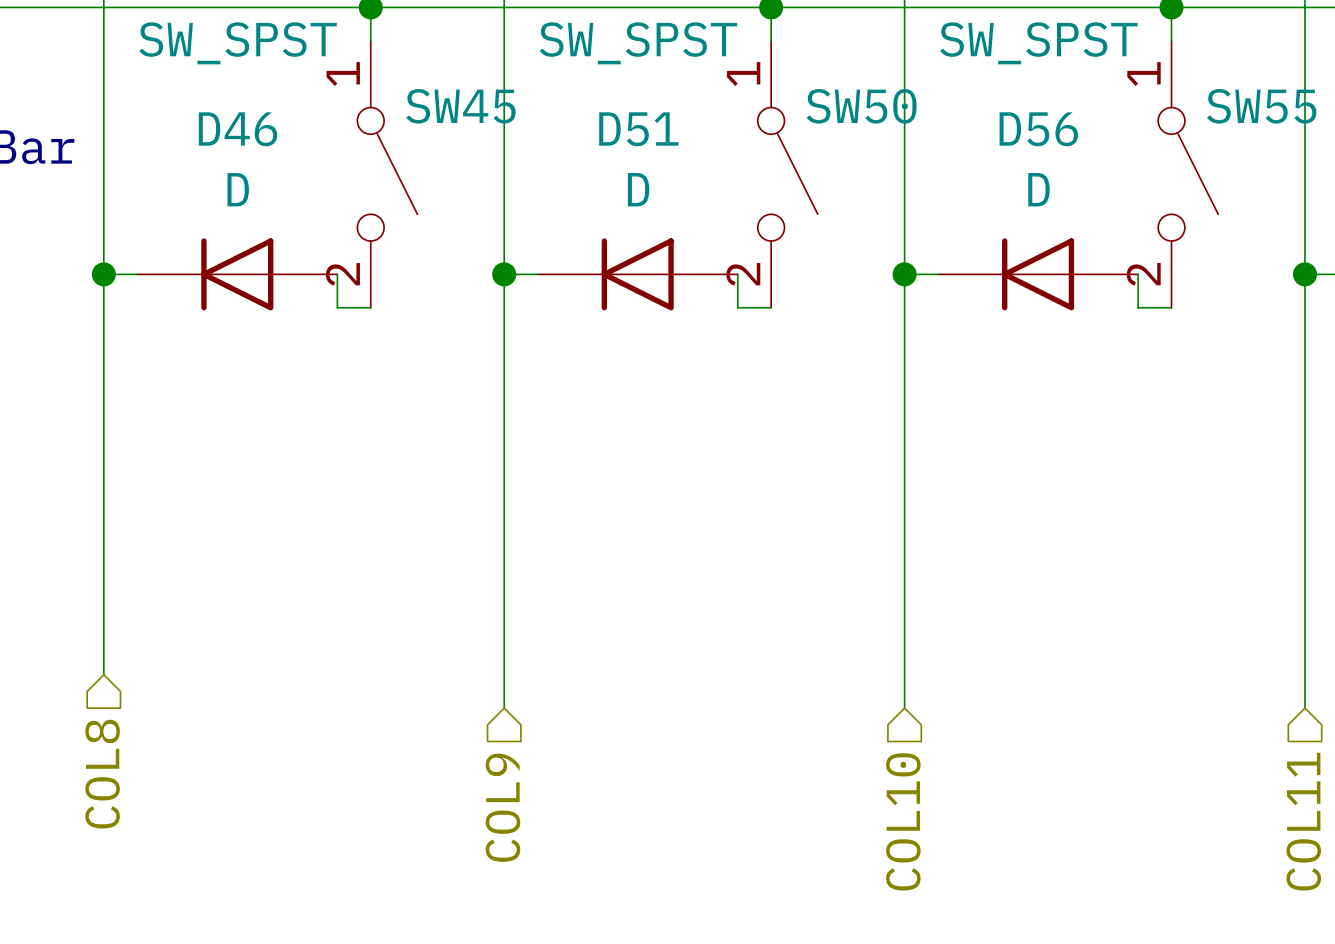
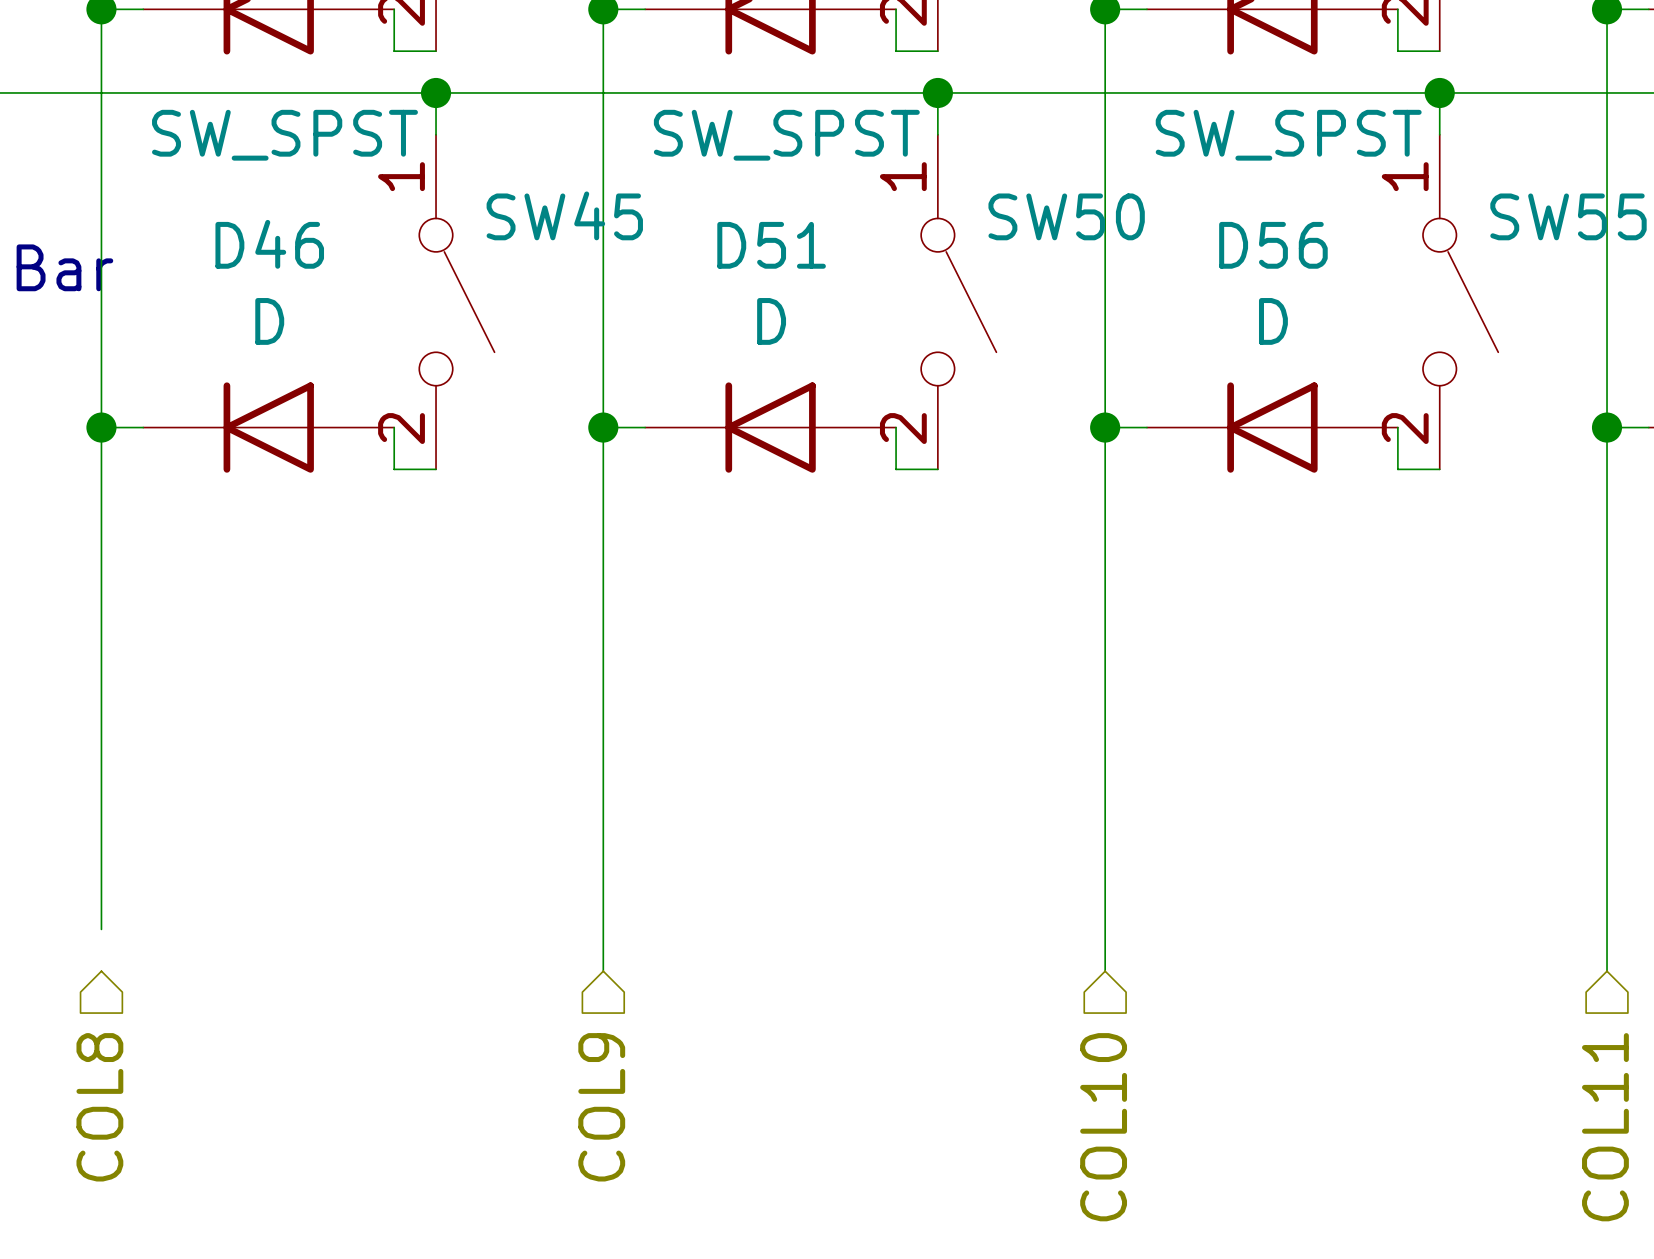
hierarchical label position: COL8 (102, 774) -> COL8 (99, 1107)

